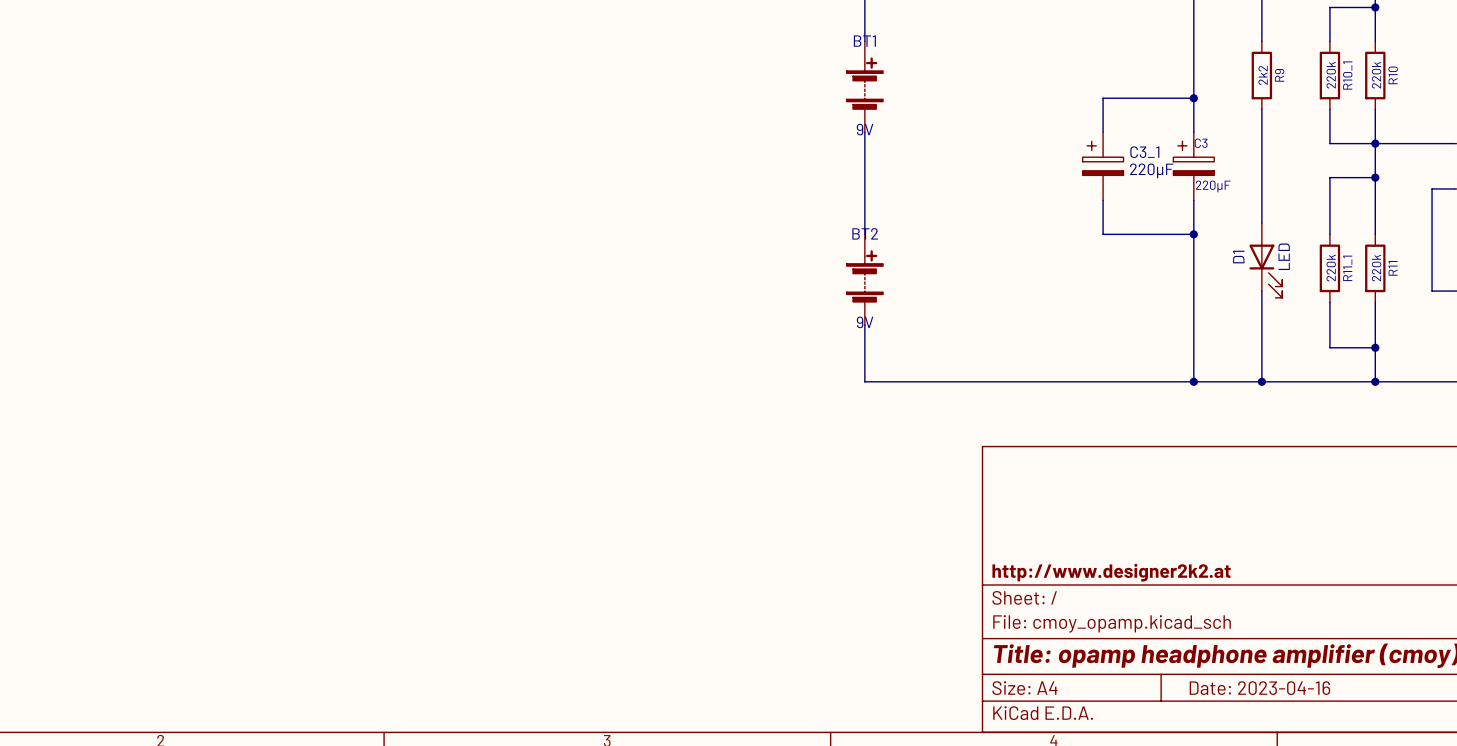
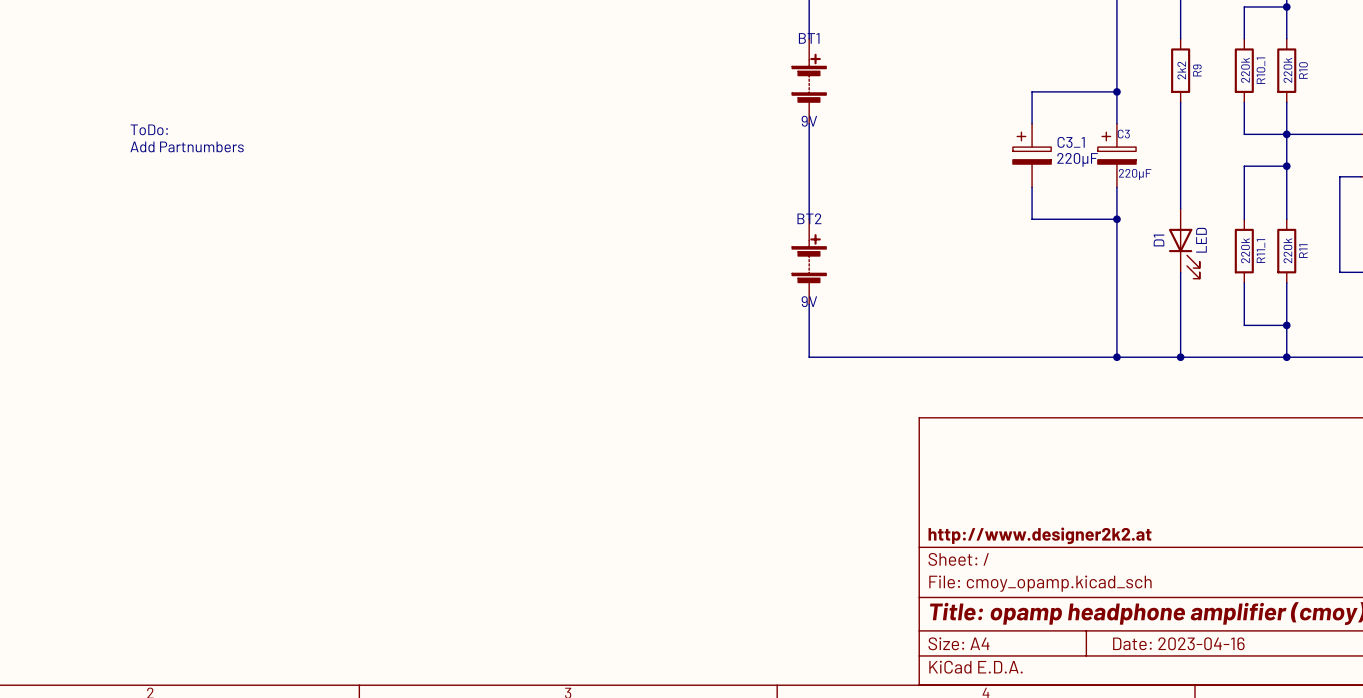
text: none -> ToDo: (149, 129)
text: none -> Add Partnumbers (187, 146)

